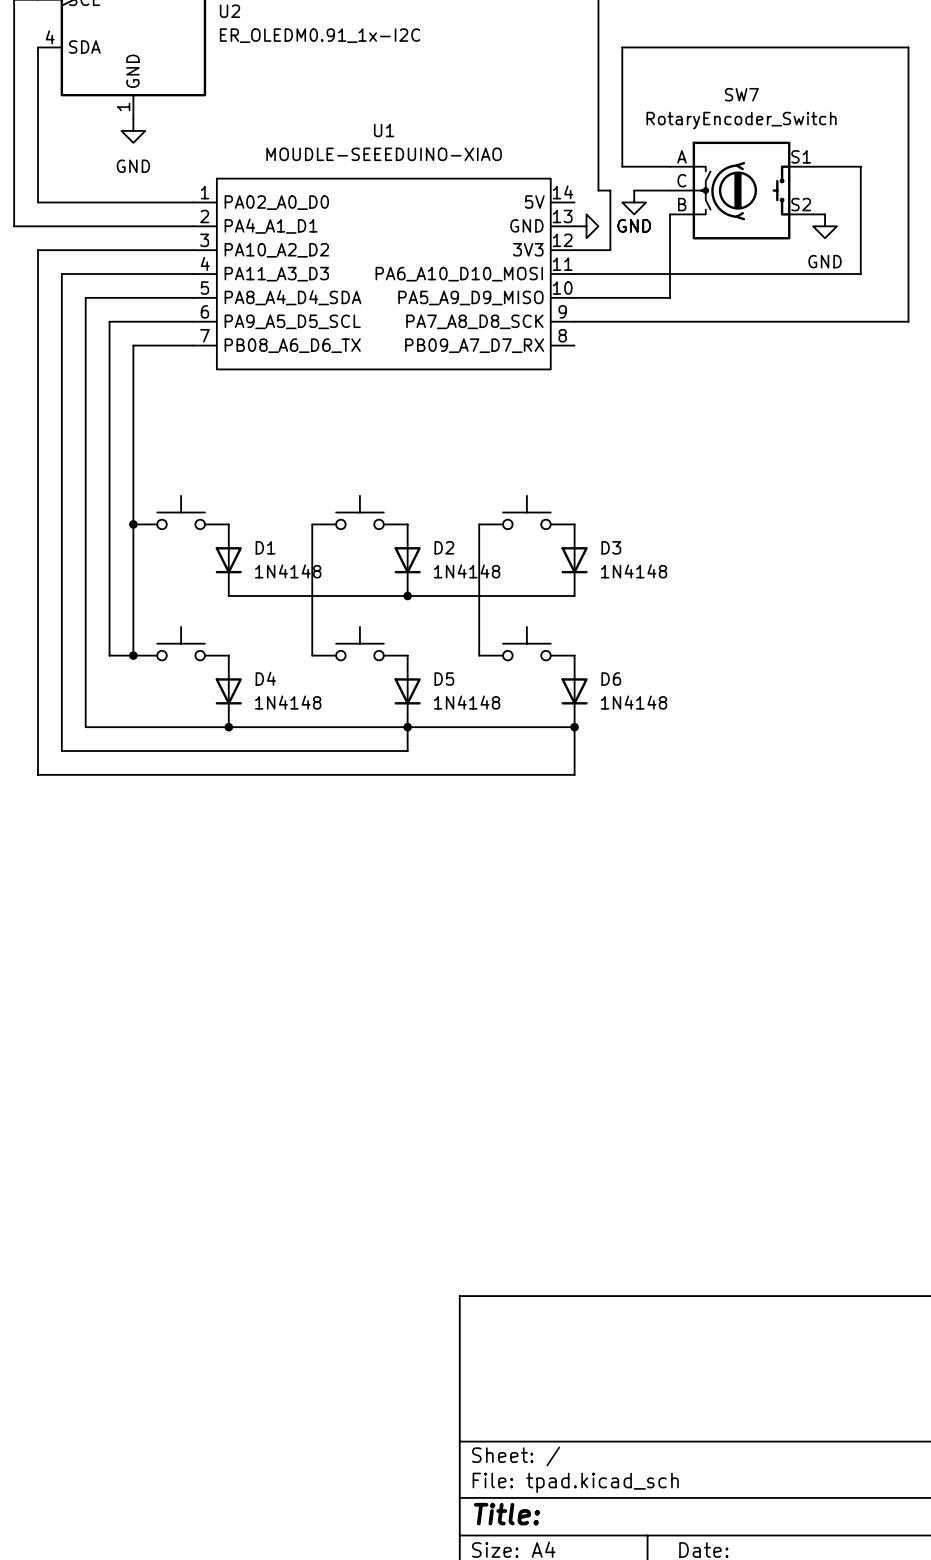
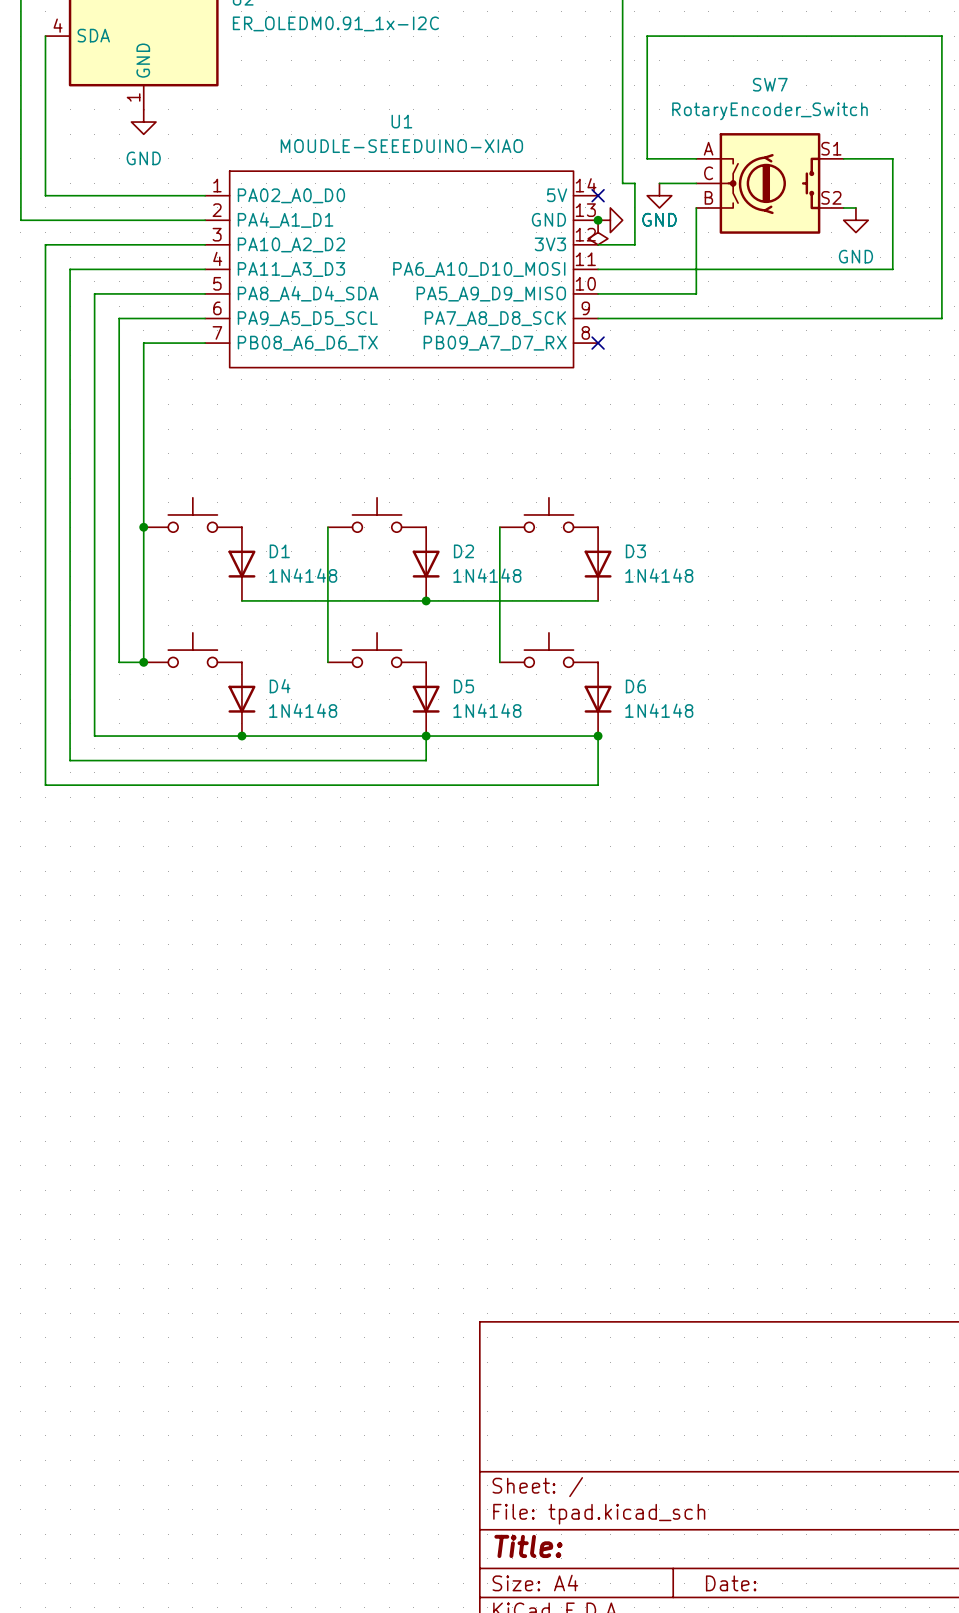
no-connect mark: none -> (598, 195)
junction: none -> (598, 220)
power symbol: none -> (598, 232)
no-connect mark: none -> (598, 343)

